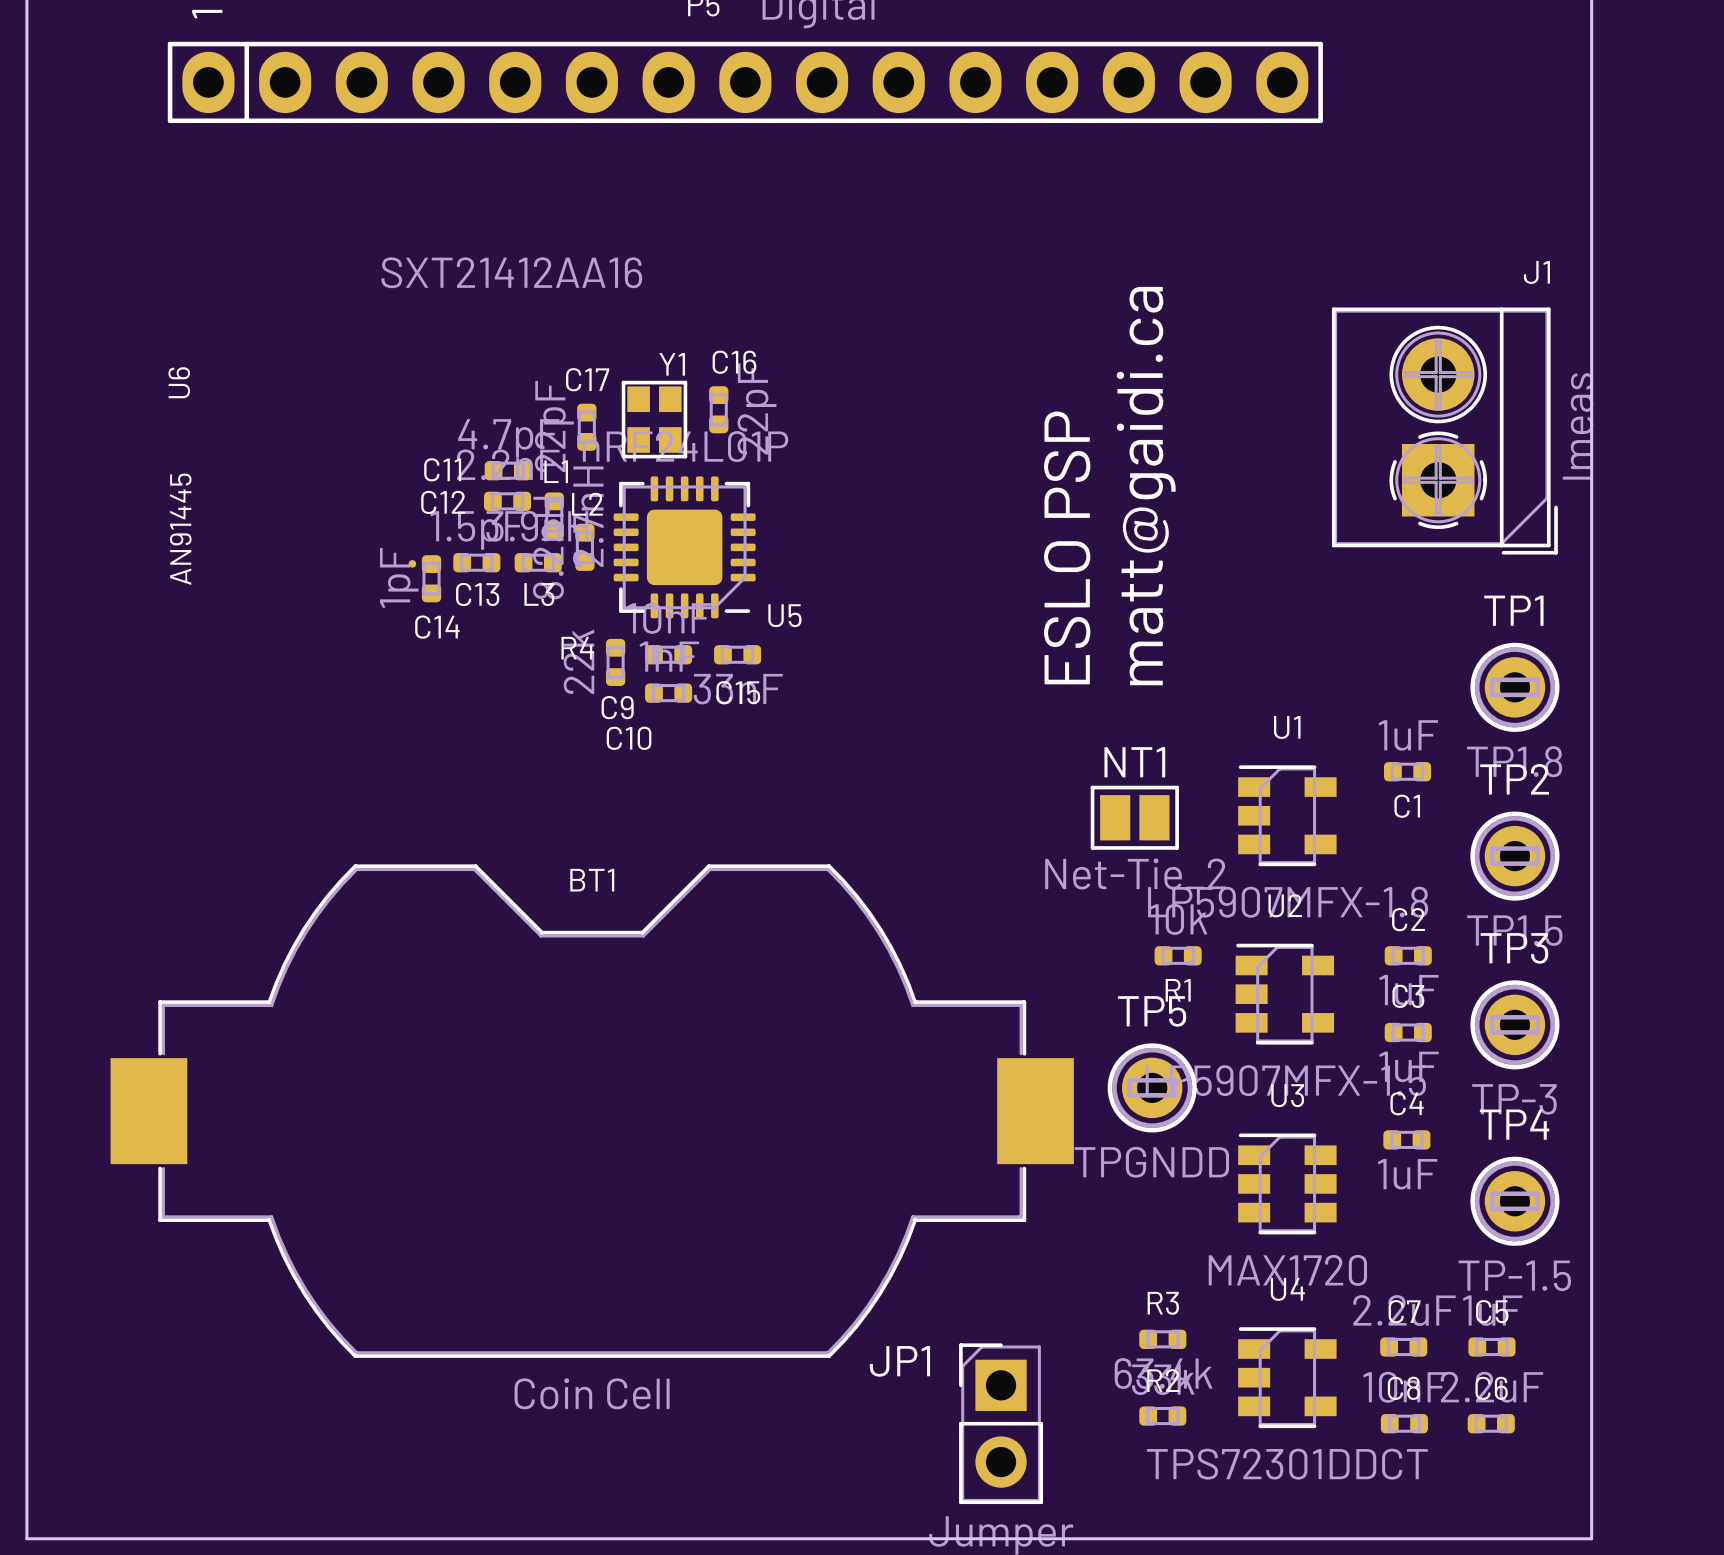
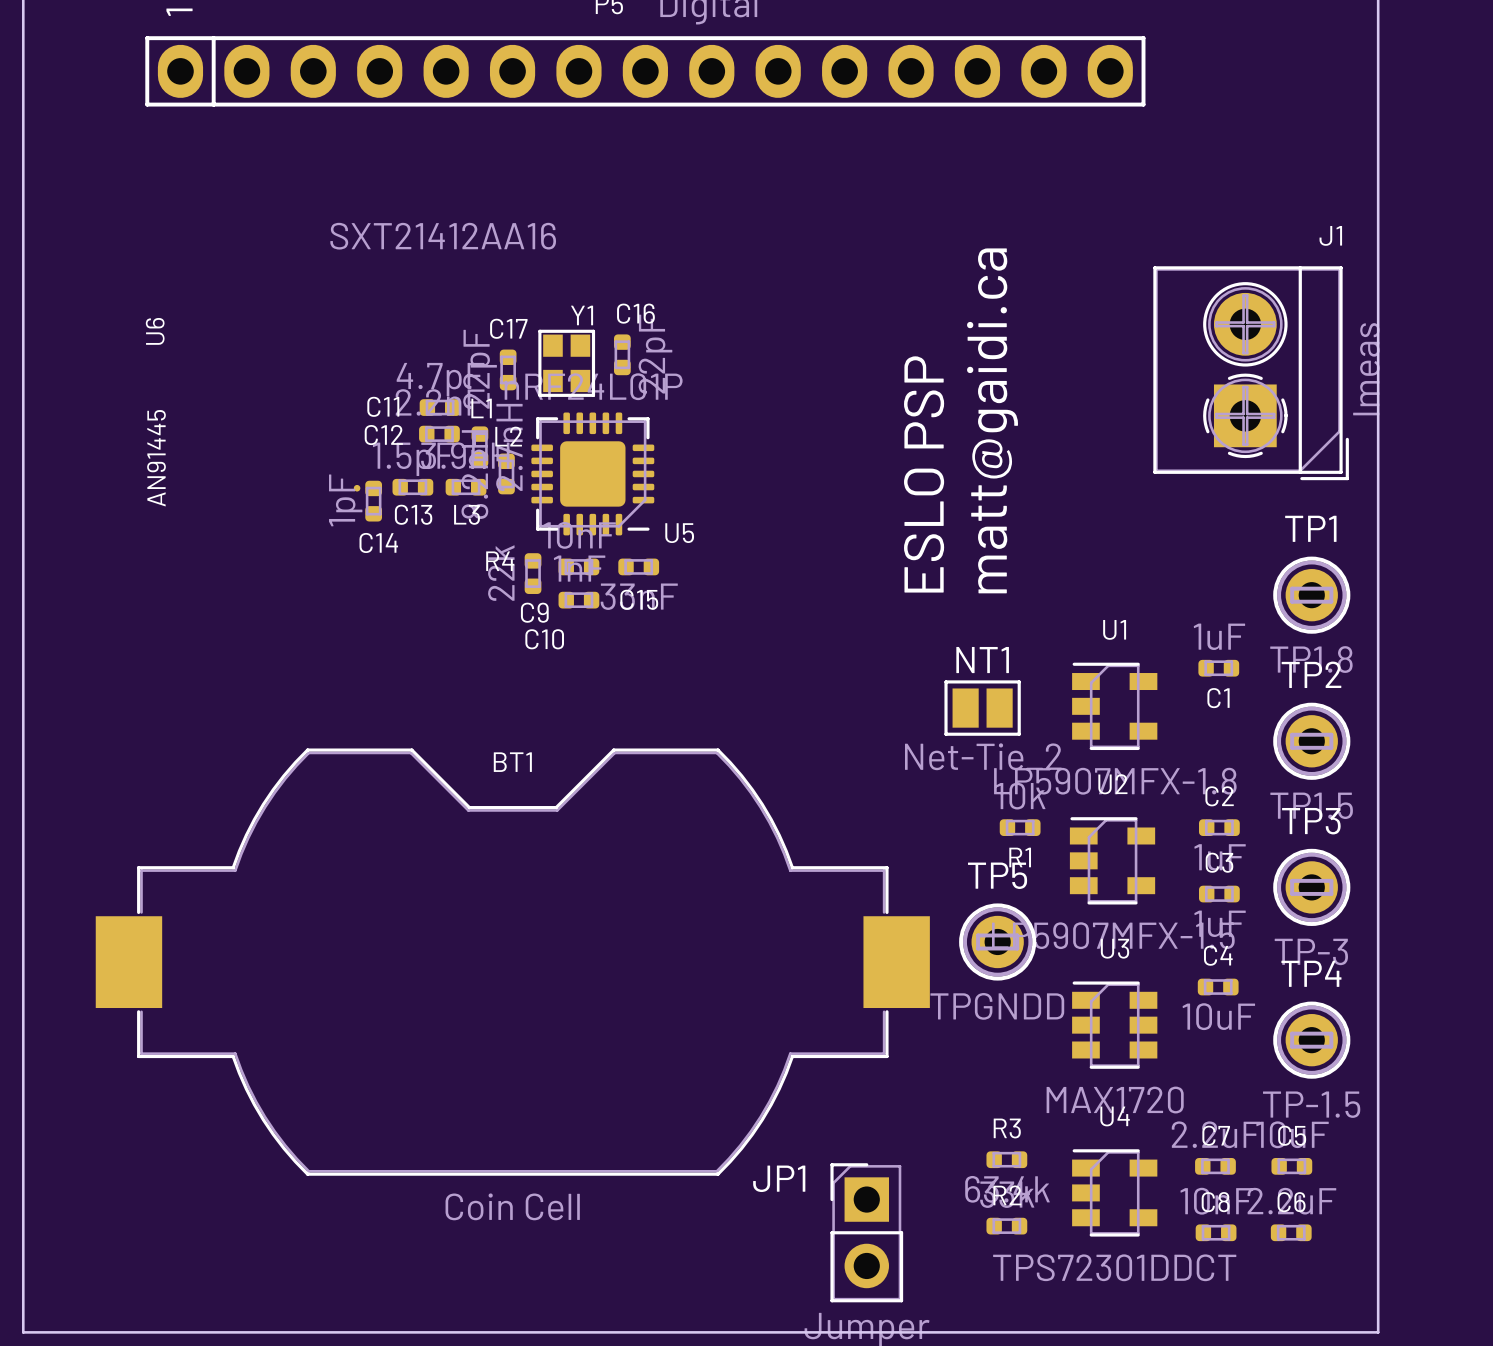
C4 value: 1uF (1407, 1174) -> 10uF (1218, 1016)
C5 value: 1uF (1492, 1310) -> 10uF (1292, 1134)

